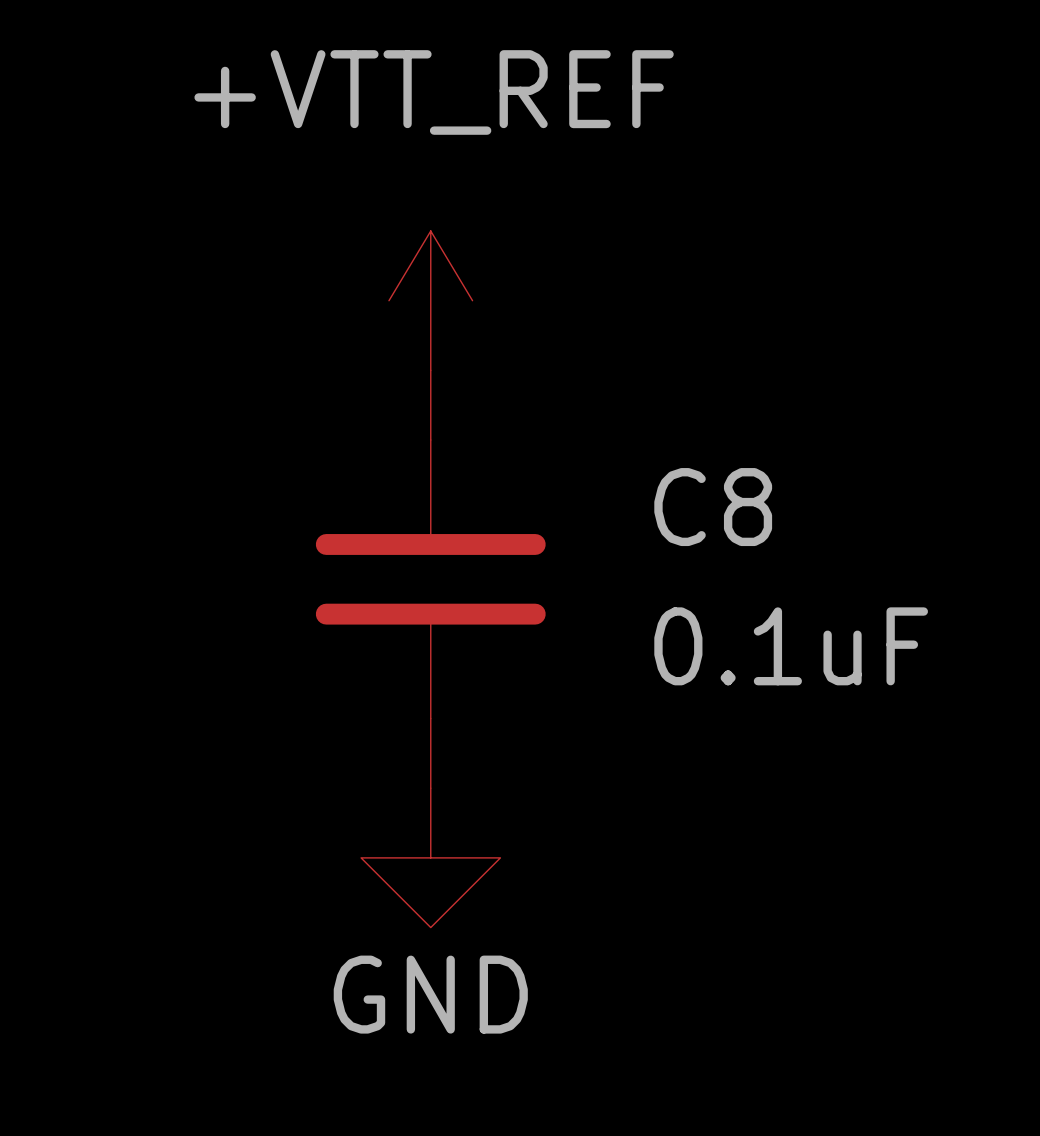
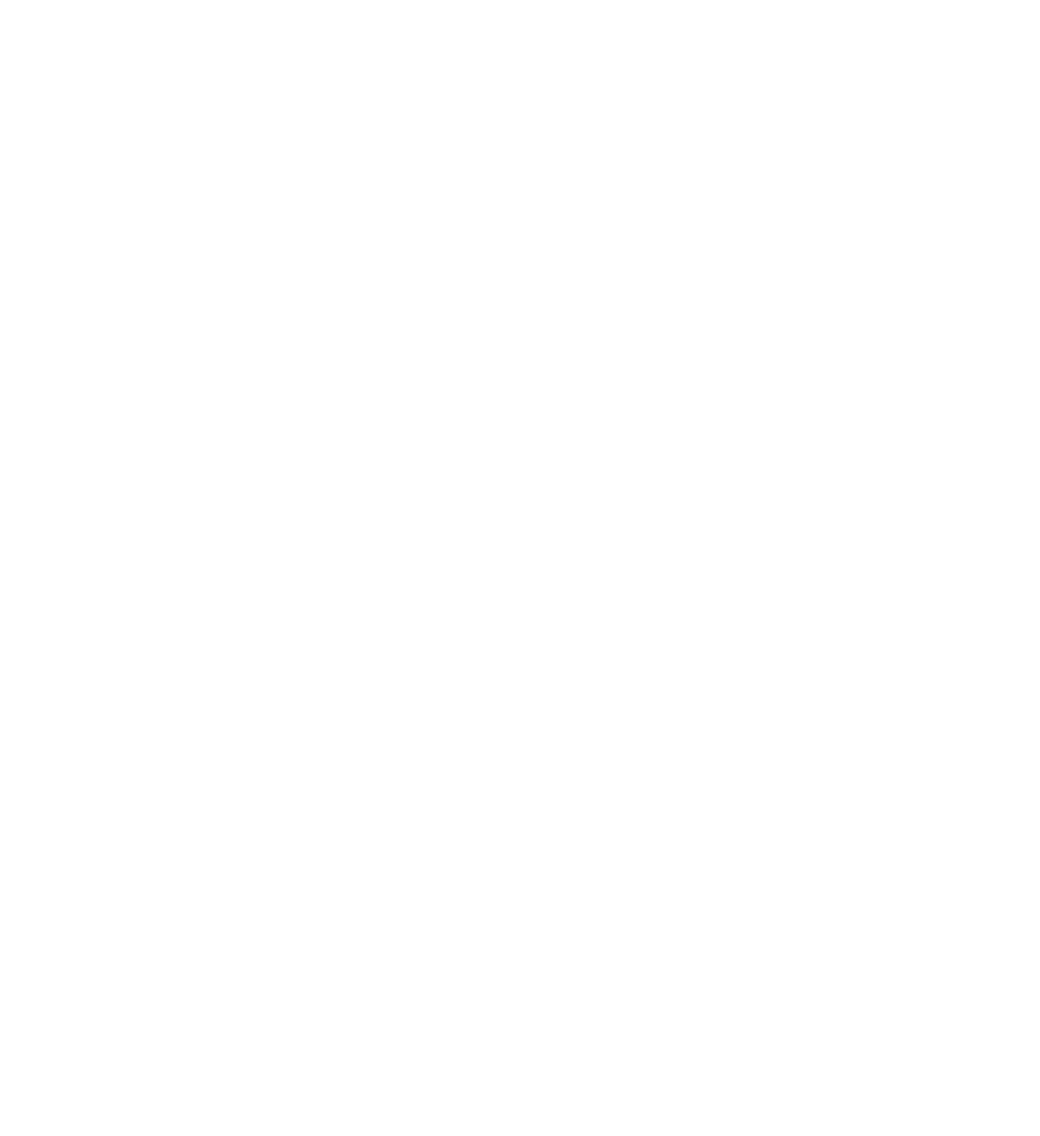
power symbol: +VTT_REF (430, 300) -> none
C8: (430, 579) -> none
power symbol: GND (430, 857) -> none

